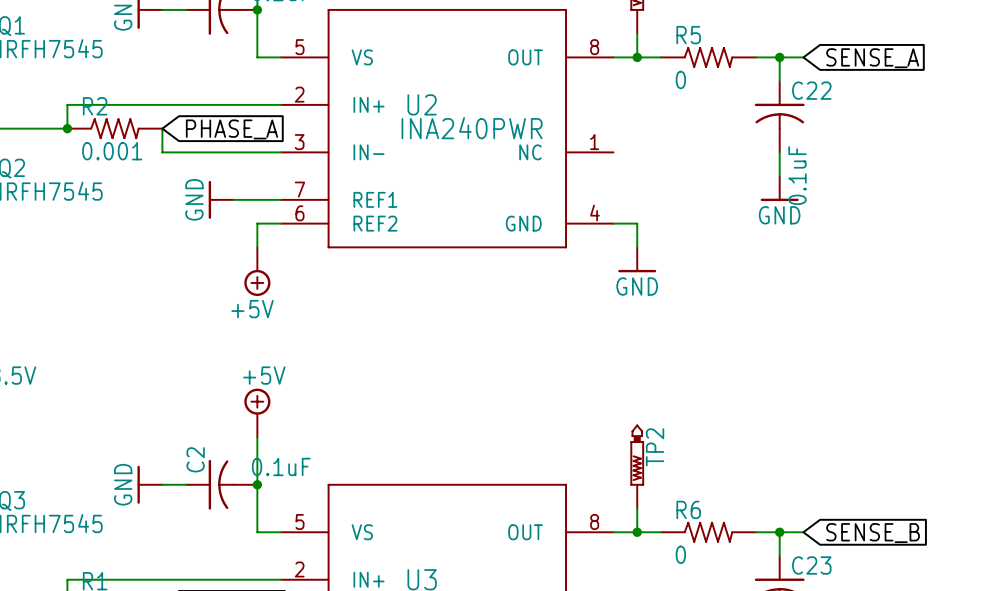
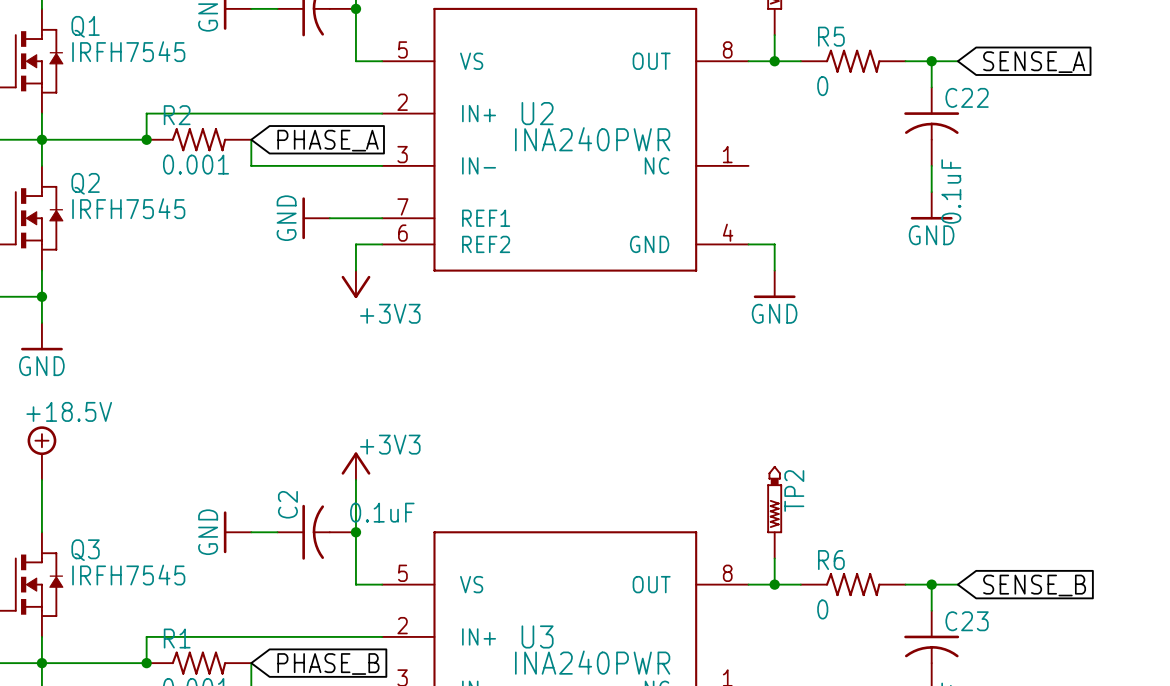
power symbol: none -> +3V3 (355, 284)
power symbol: +5V (257, 271) -> none
power symbol: +5V (257, 412) -> none
power symbol: none -> +3V3 (355, 466)

